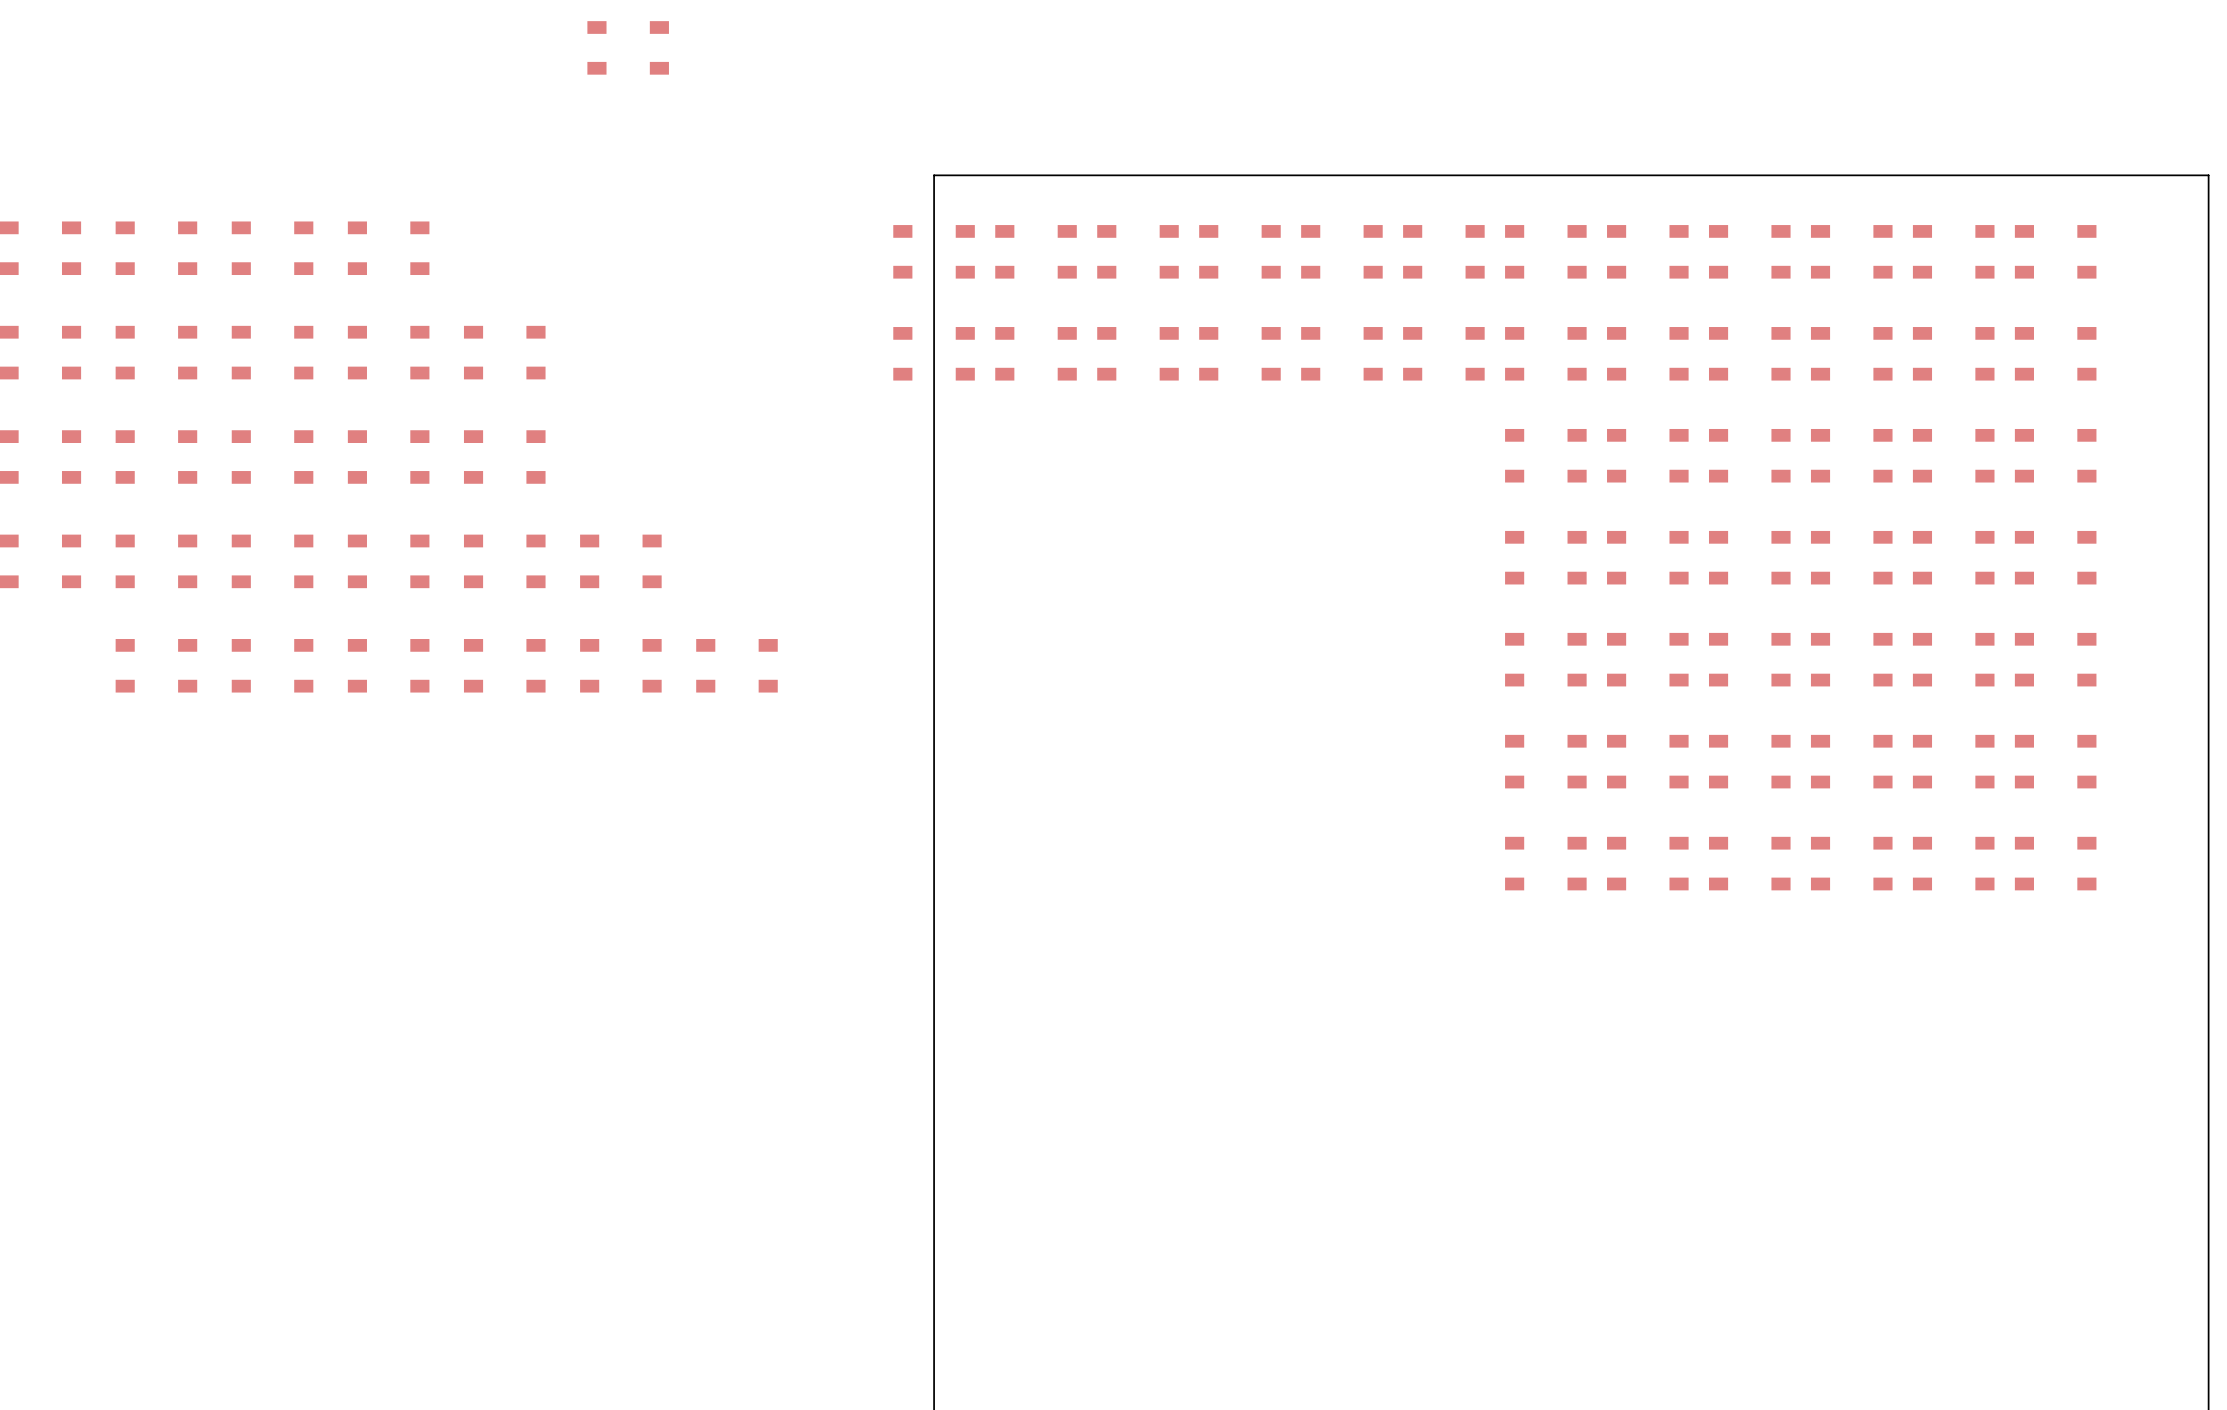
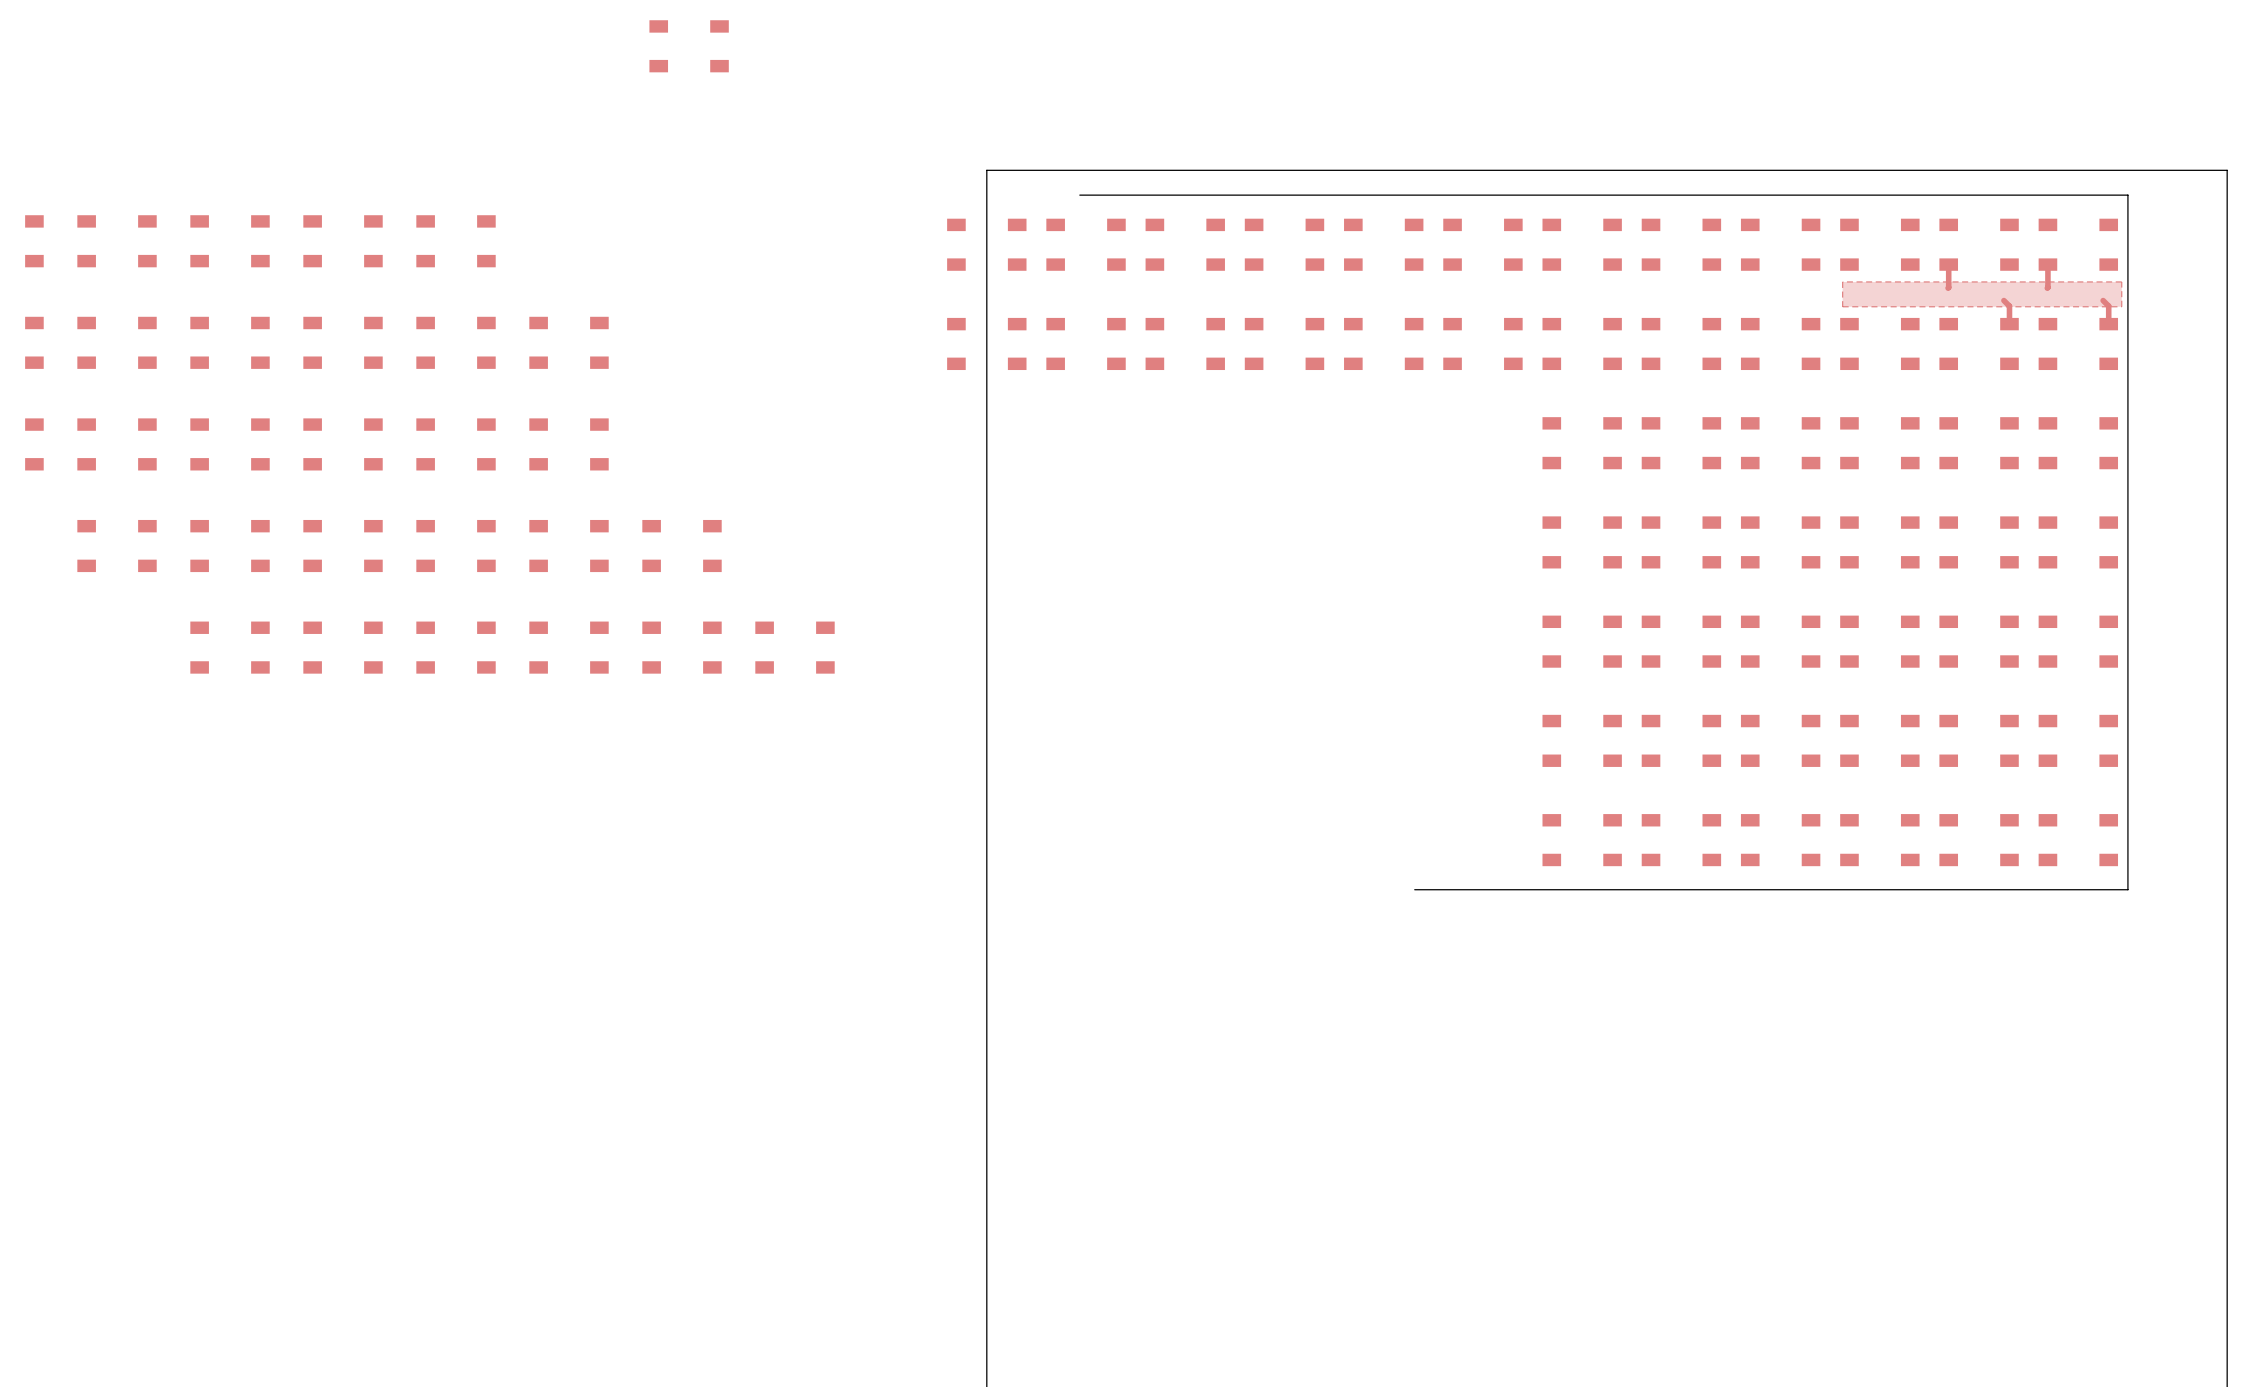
board edge: none -> (1079, 195) (2127, 195) (2127, 889) (1414, 889)
top track: none -> (1948, 264) (1948, 288)
top track: none -> (2047, 264) (2047, 288)
top zone outline: none -> (2121, 281) (1842, 281) (1842, 306) (2121, 306) (2121, 281)
top track: none -> (2003, 300) (2009, 306) (2009, 324)
top track: none -> (2103, 300) (2108, 306) (2108, 324)

